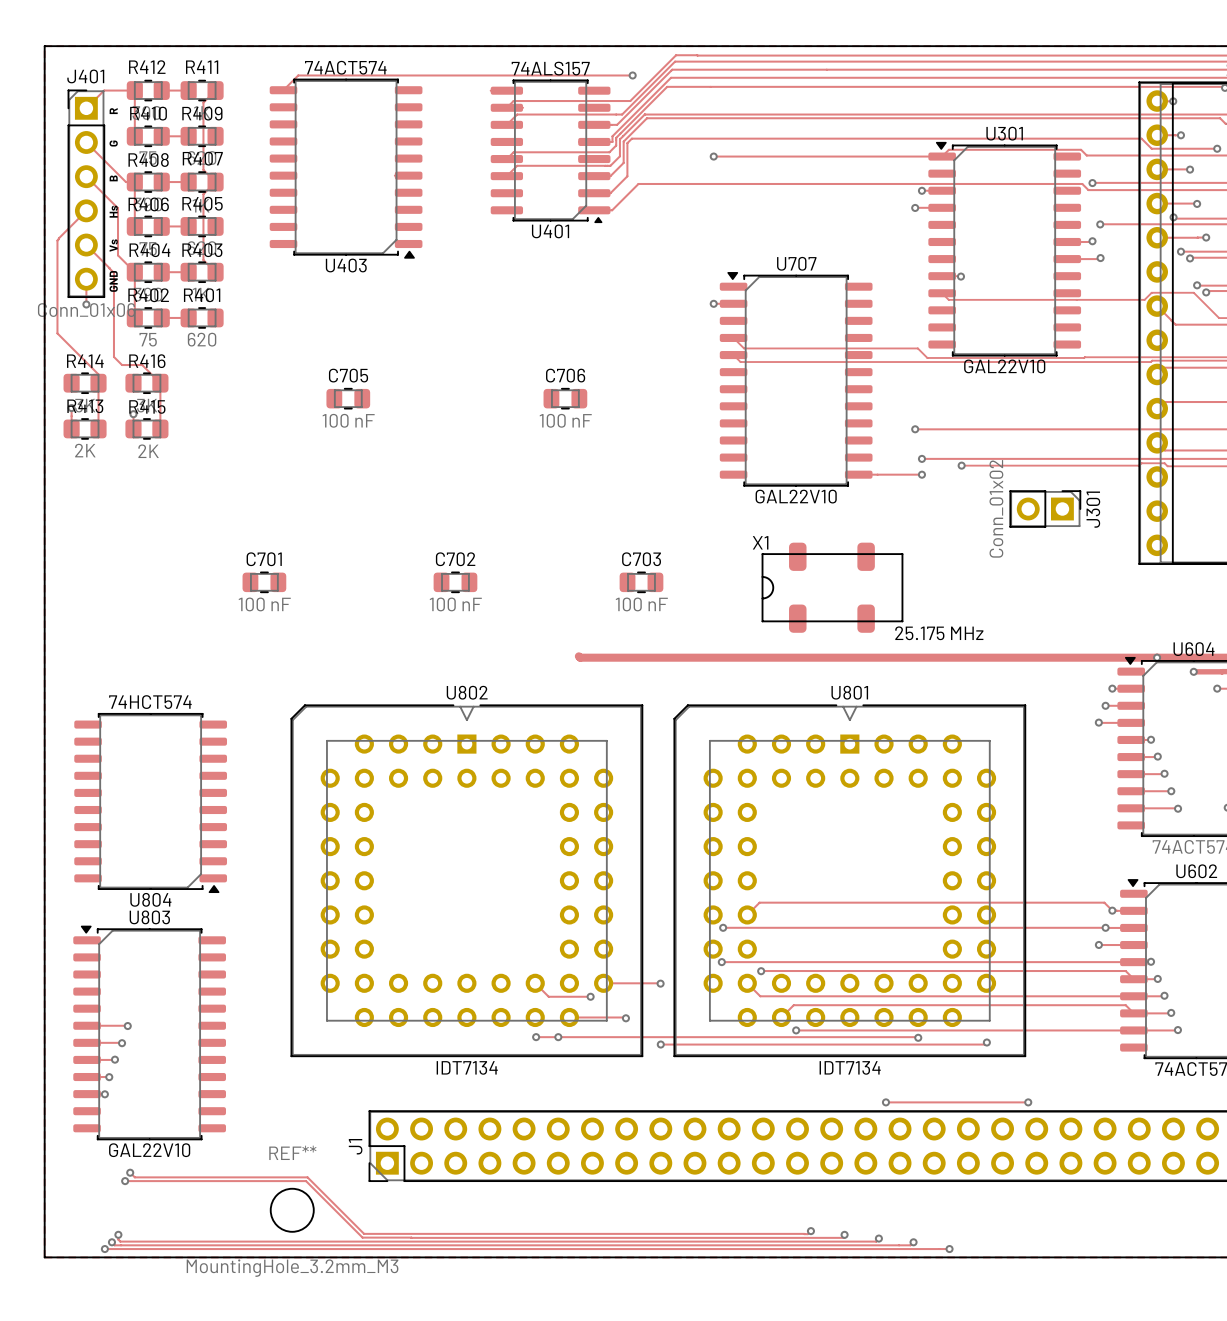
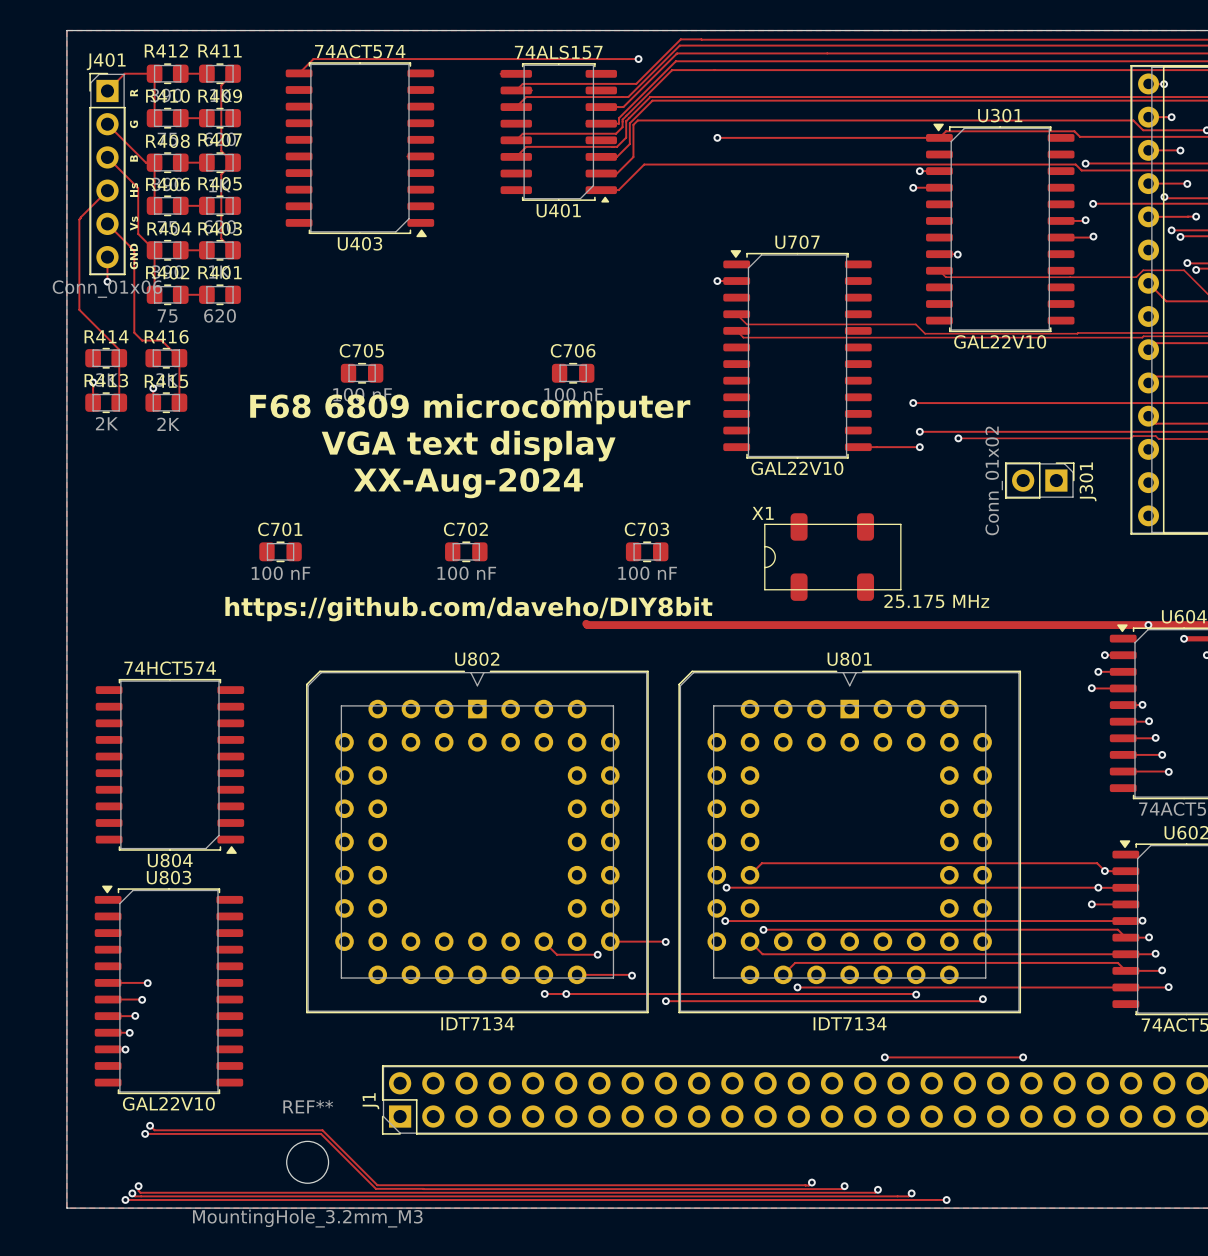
text: none -> F68 6809 microcomputer (470, 409)
text: none -> VGA text display (468, 446)
text: none -> XX-Aug-2024 (468, 483)
text: none -> https://github.com/daveho/DIY8bit (468, 609)

